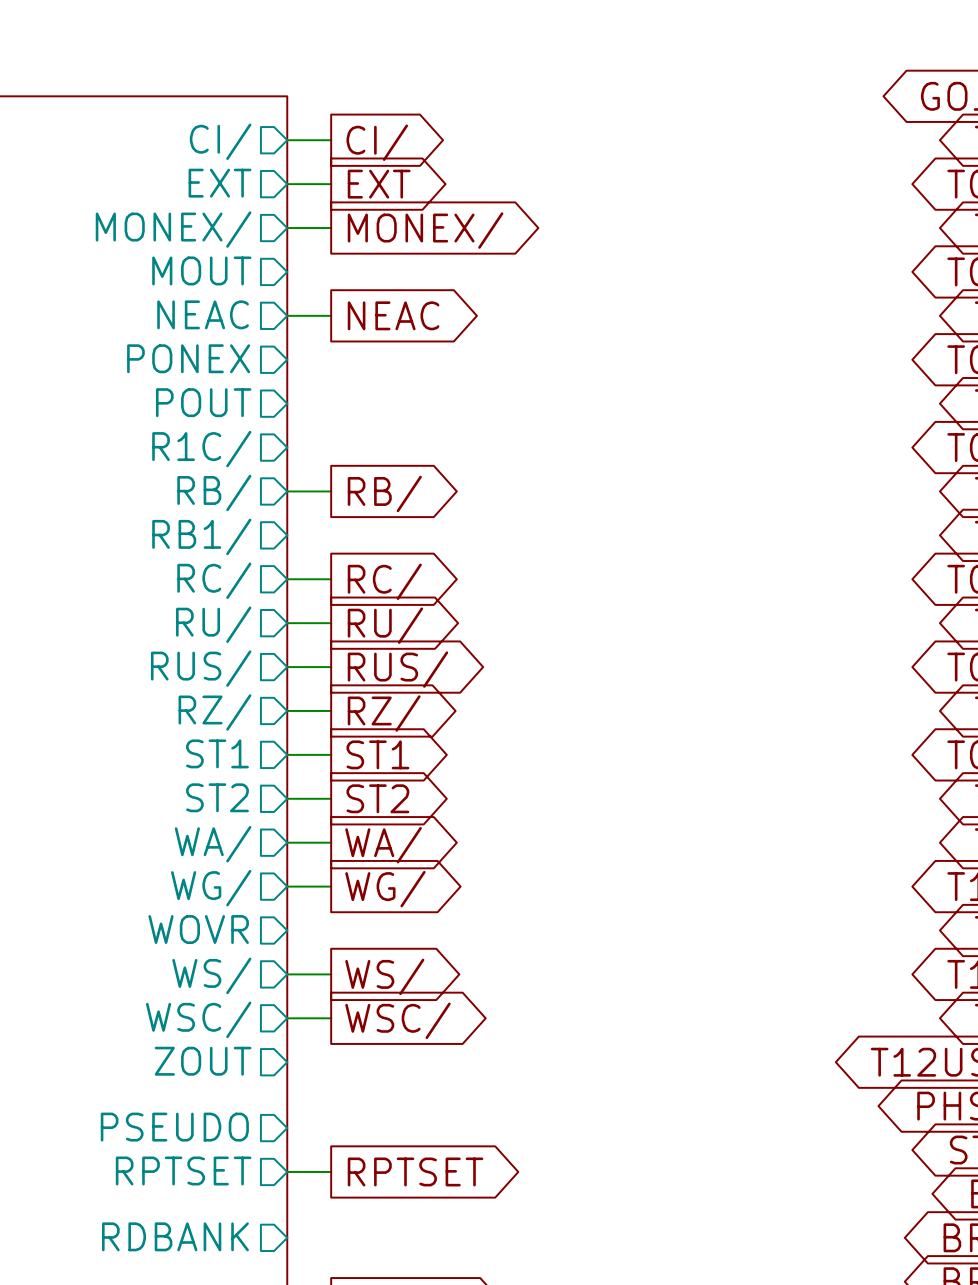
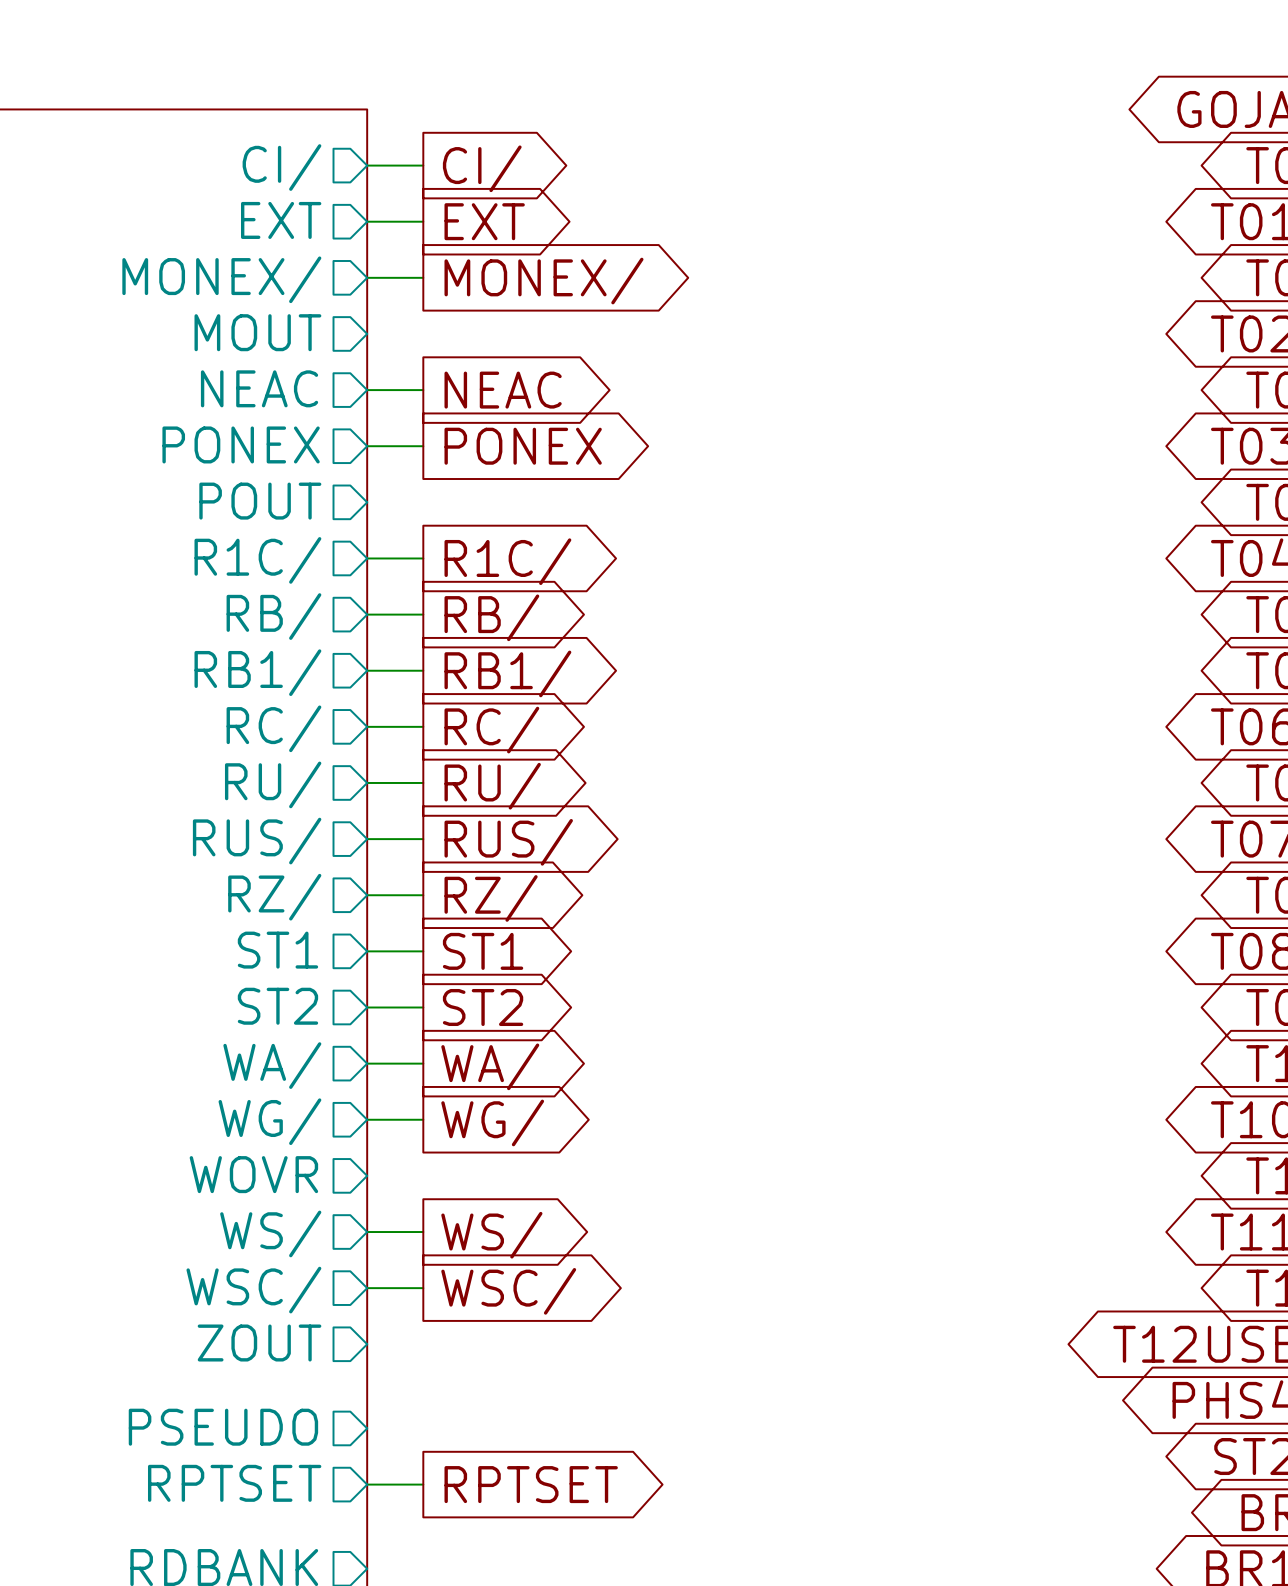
wire: none -> (367, 446) (423, 446)
global label: none -> PONEX (523, 446)
wire: none -> (367, 558) (423, 558)
global label: none -> R1C/ (507, 561)
wire: none -> (367, 670) (423, 670)
global label: none -> RB1/ (507, 673)

